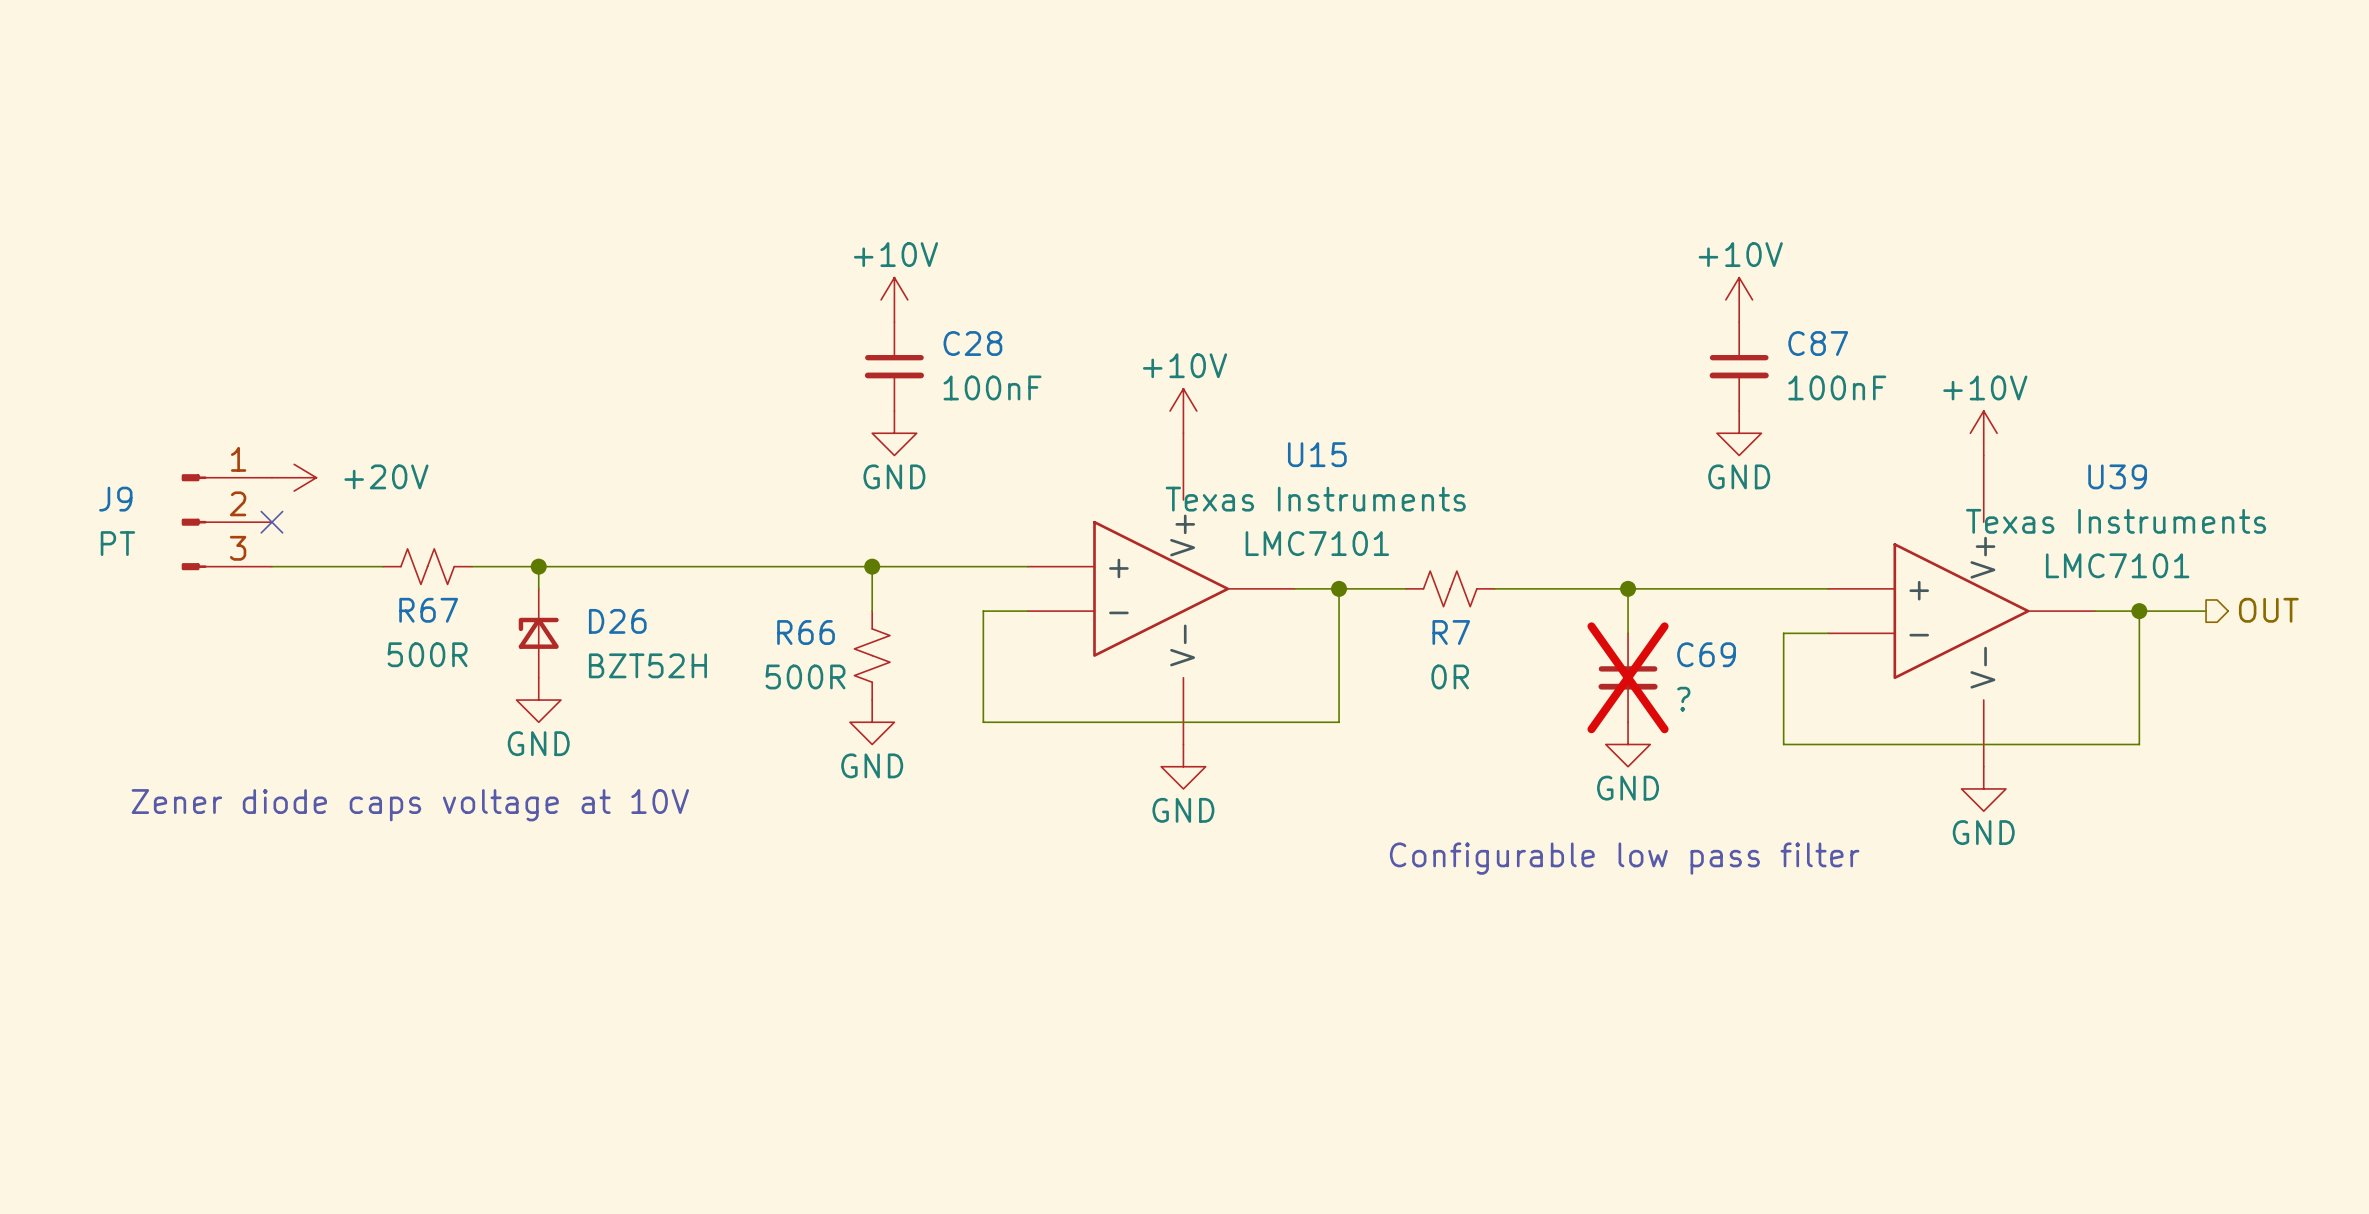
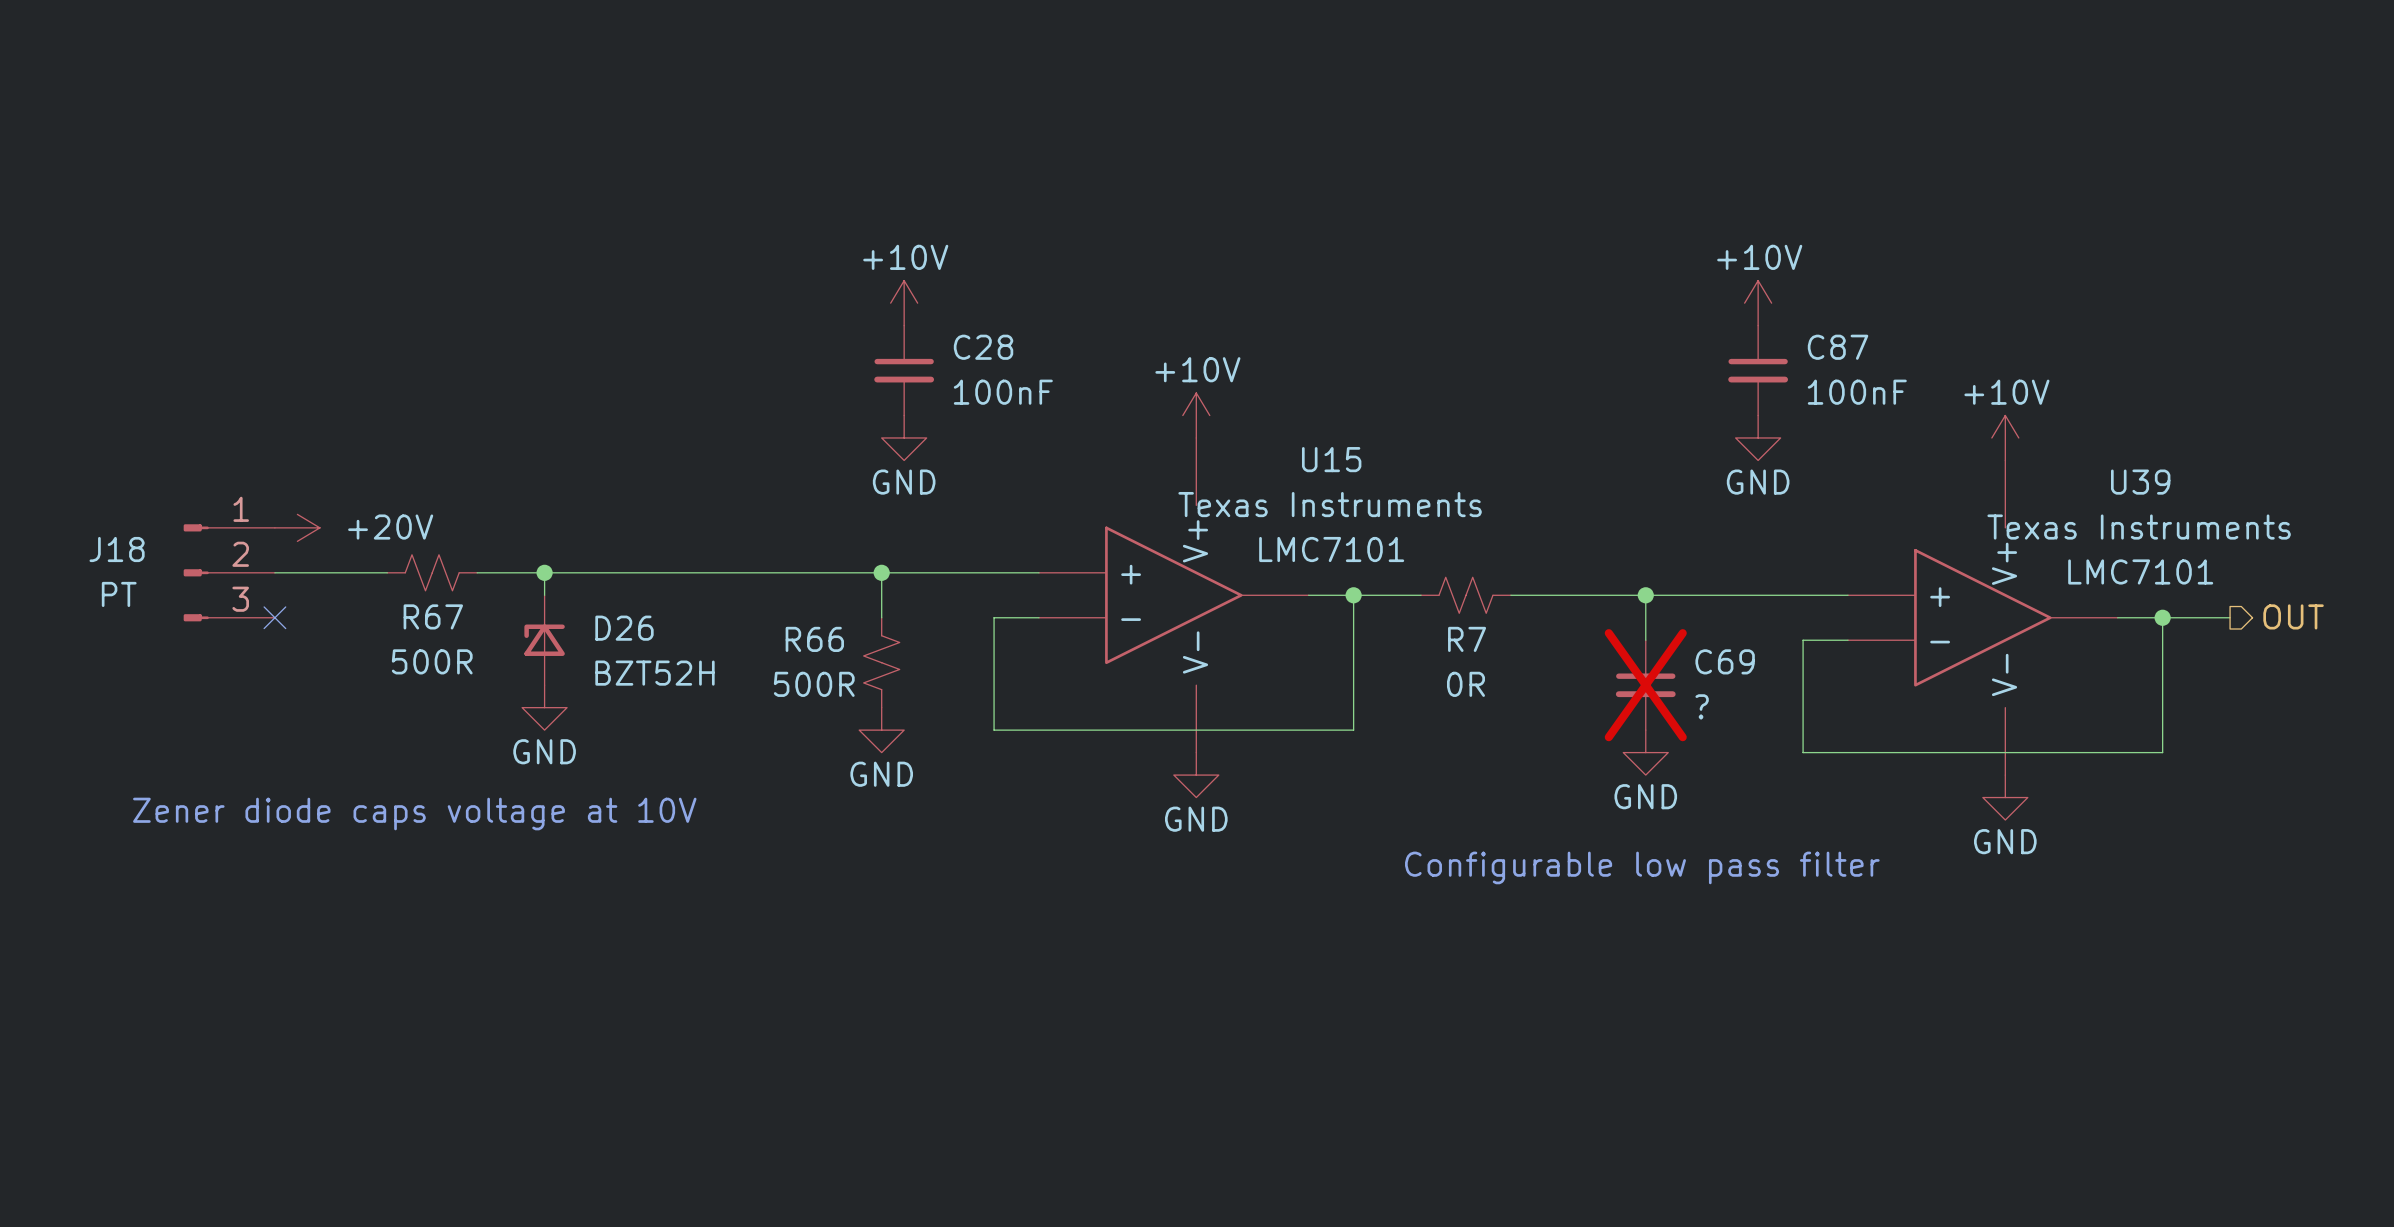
power symbol position: +20V (294, 477) -> +20V (297, 527)
J9: PT (226, 522) -> none
no-connect mark position: (271, 522) -> (274, 617)
J18: none -> PT (229, 572)

